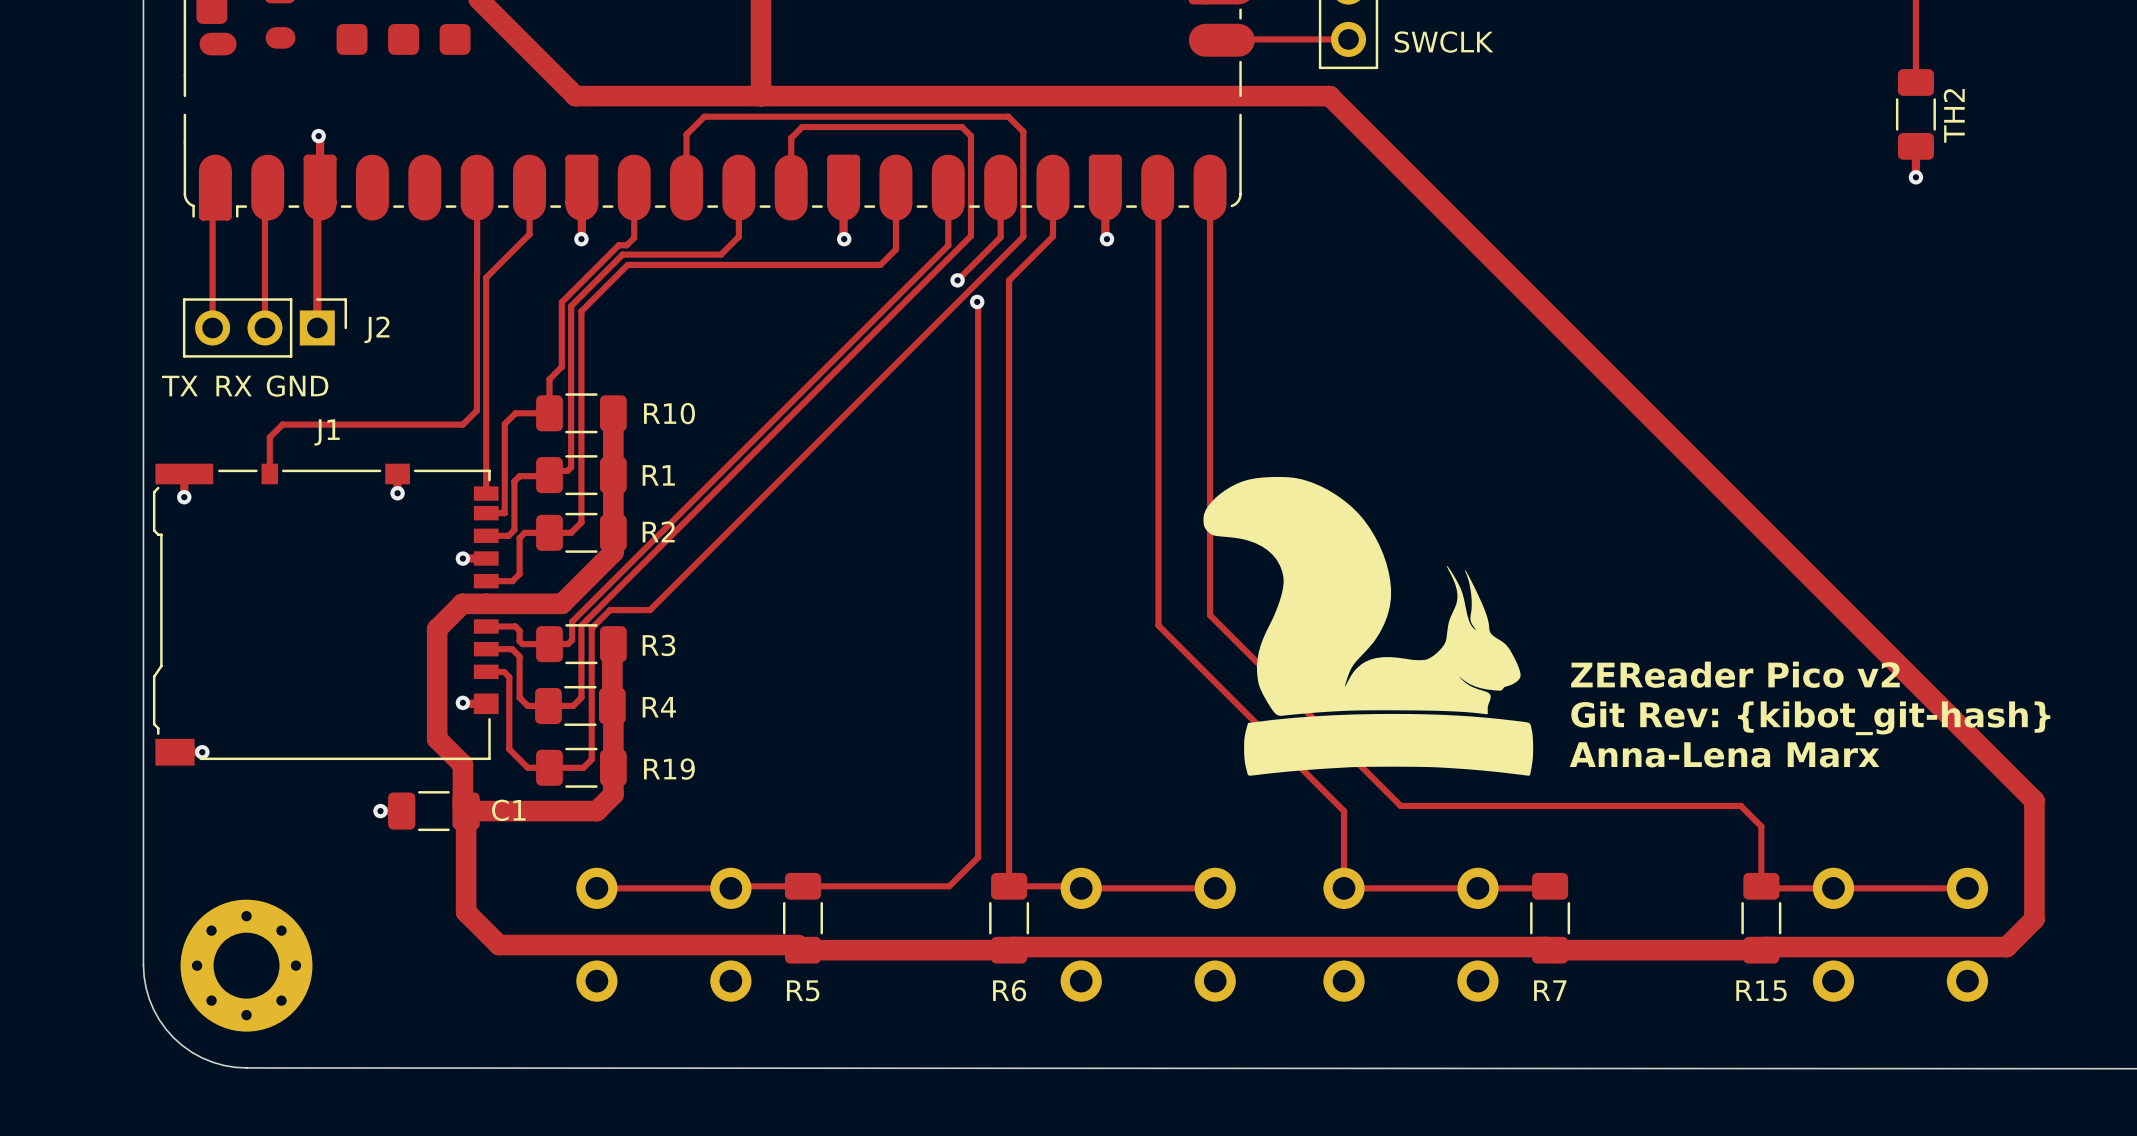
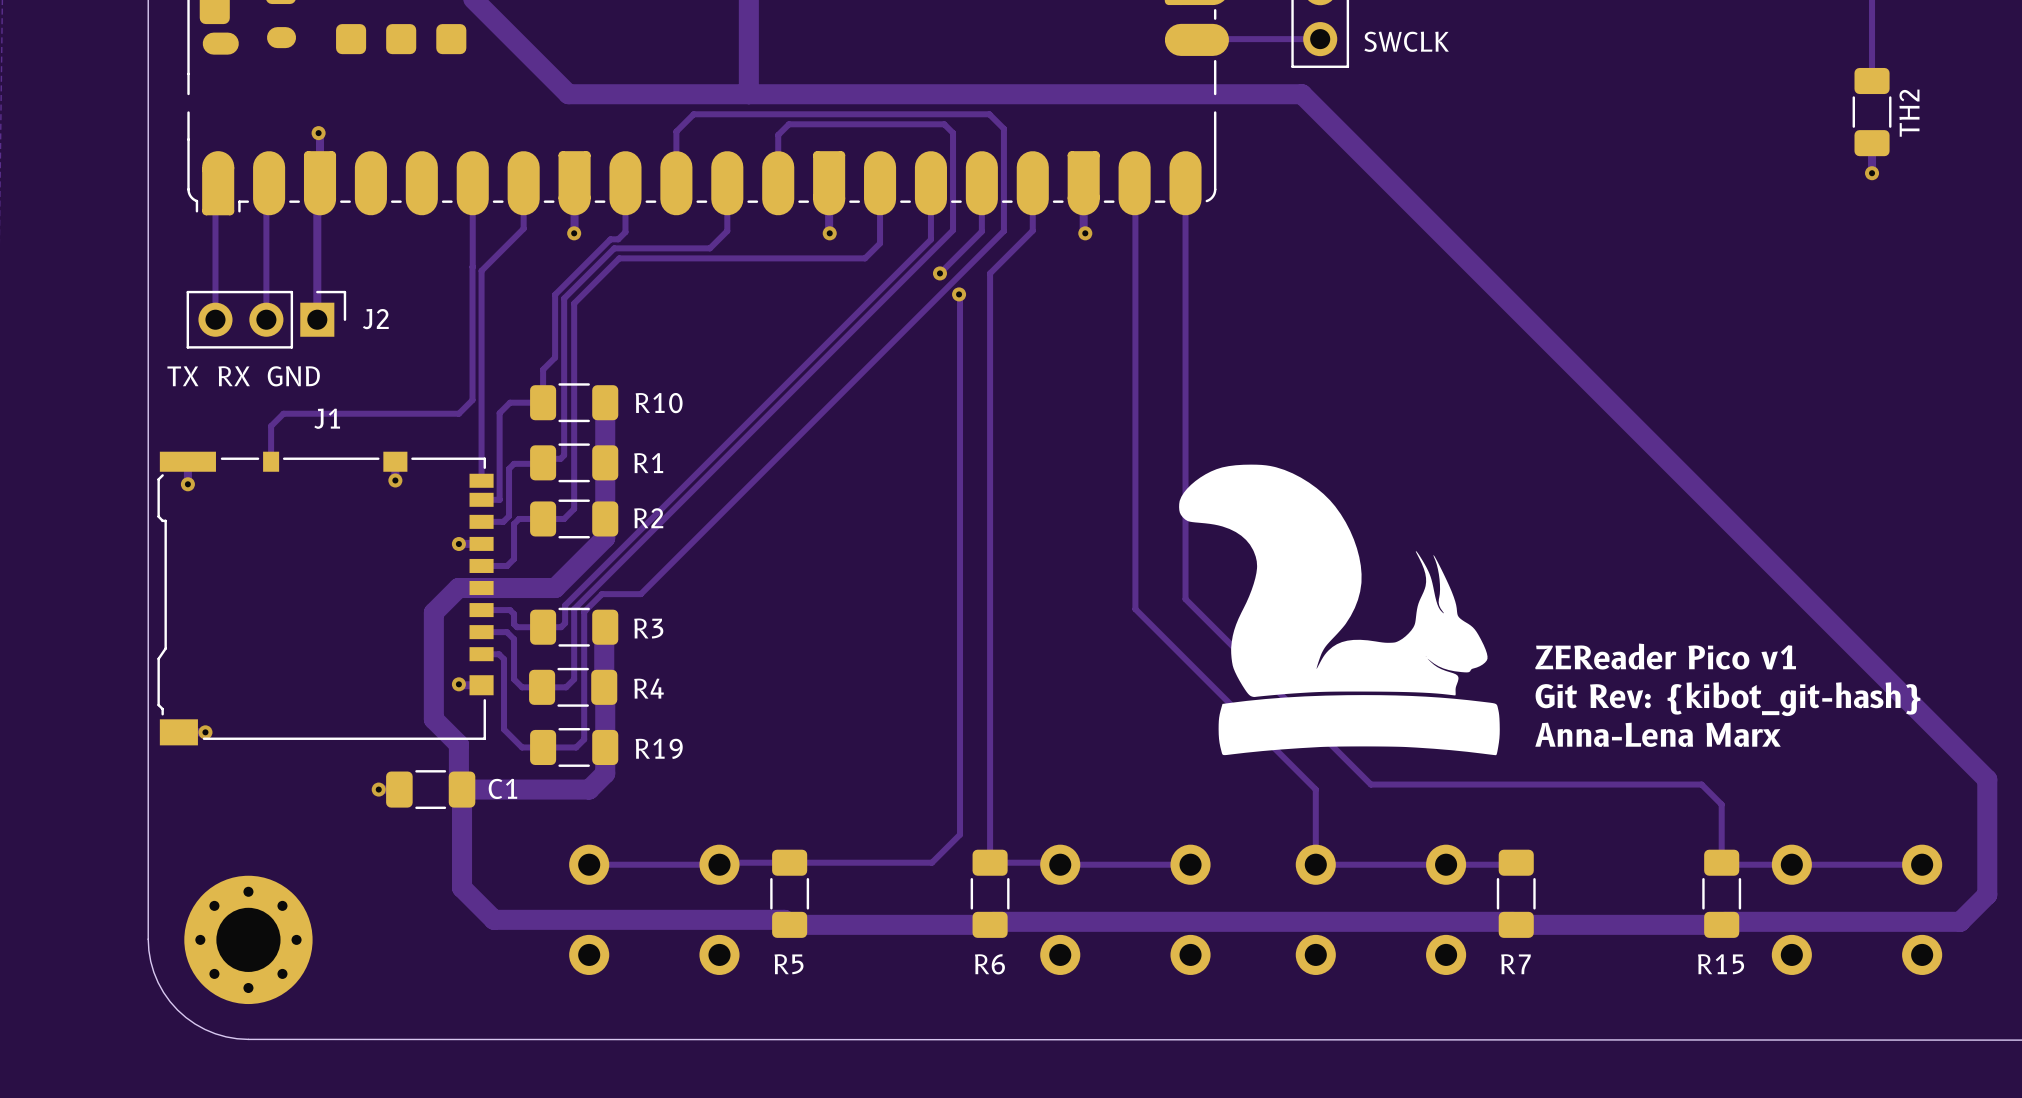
text: ZEReader Pico v2 (1735, 674) -> ZEReader Pico v1 (1665, 656)

